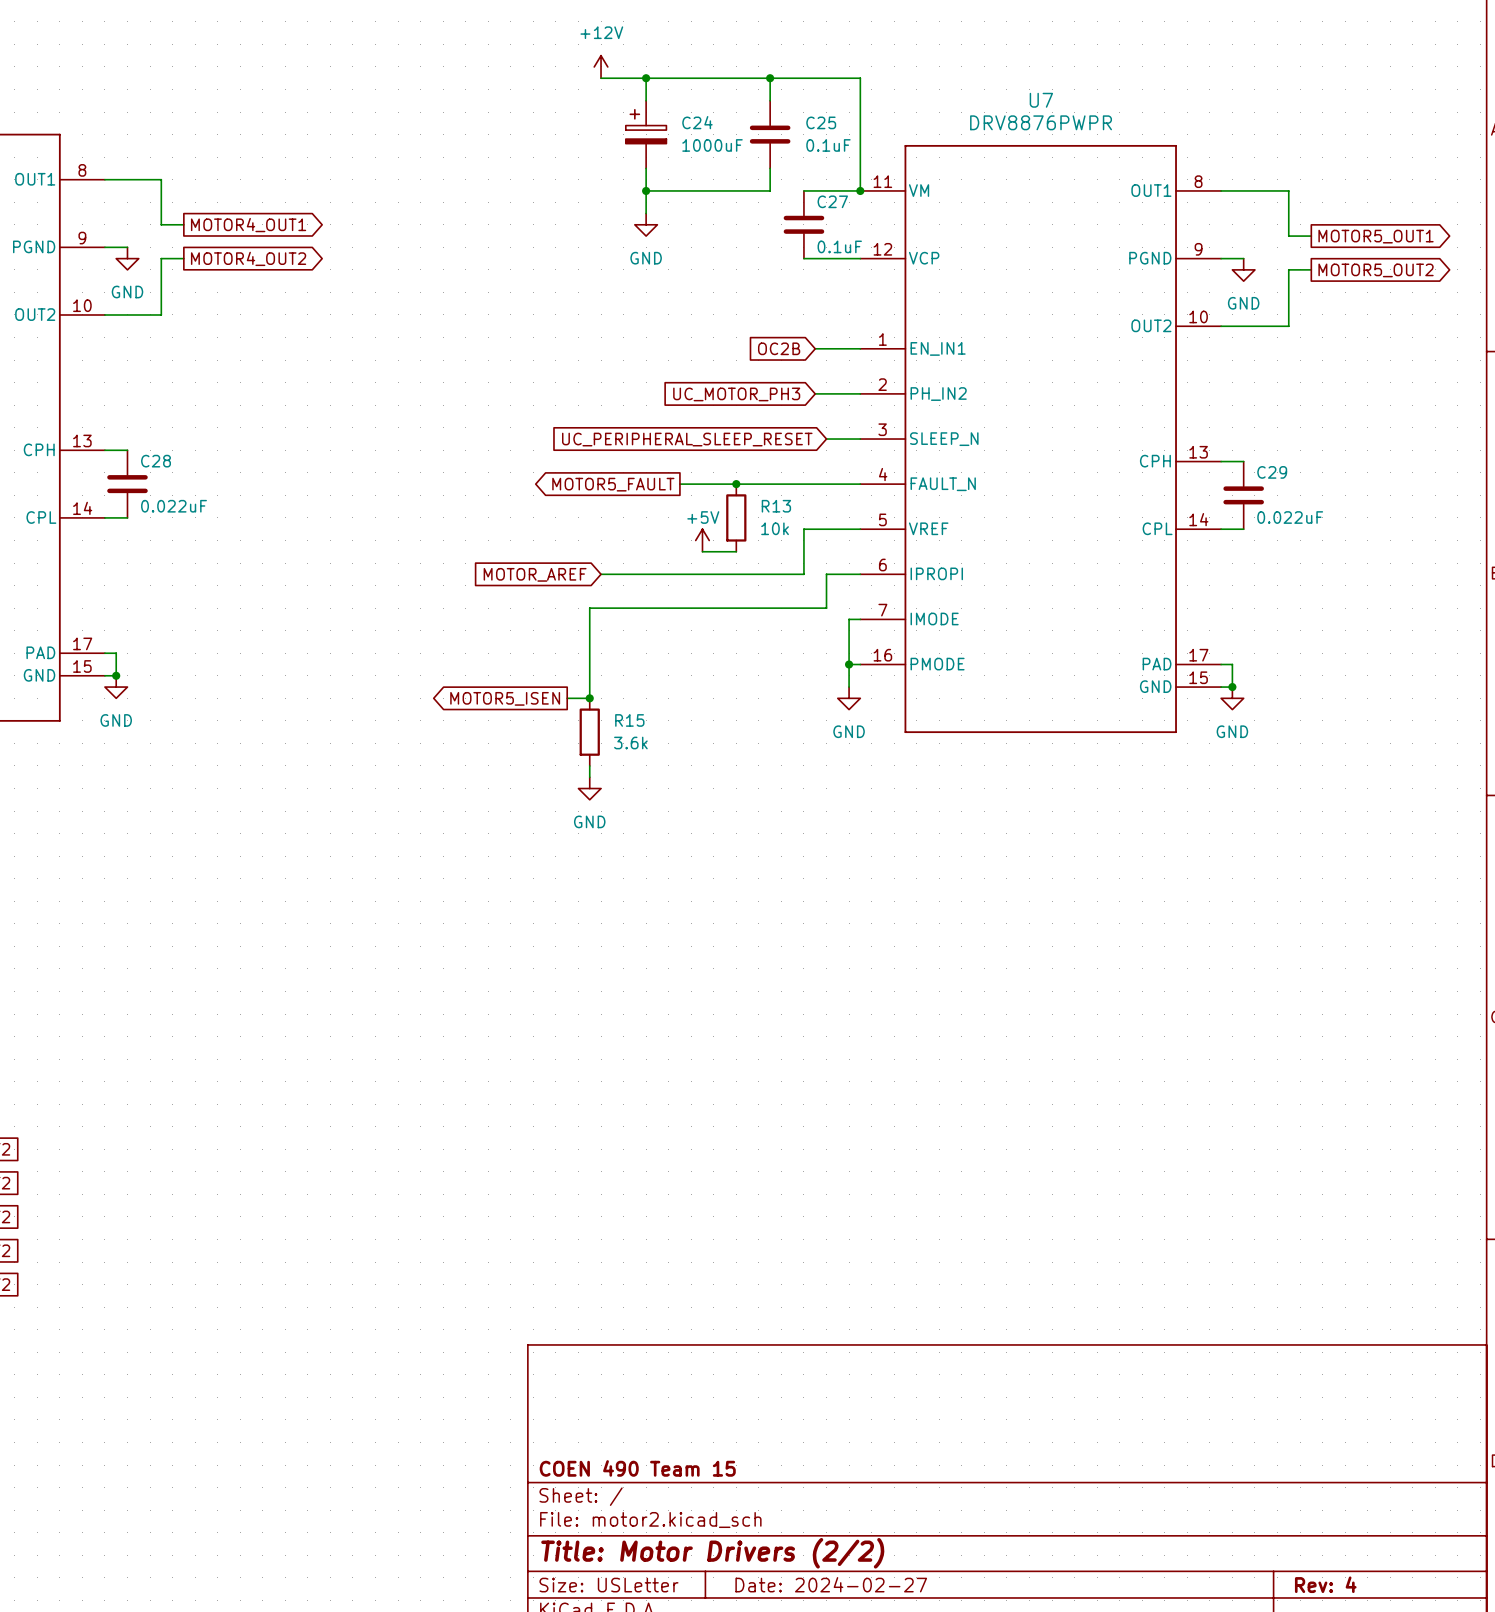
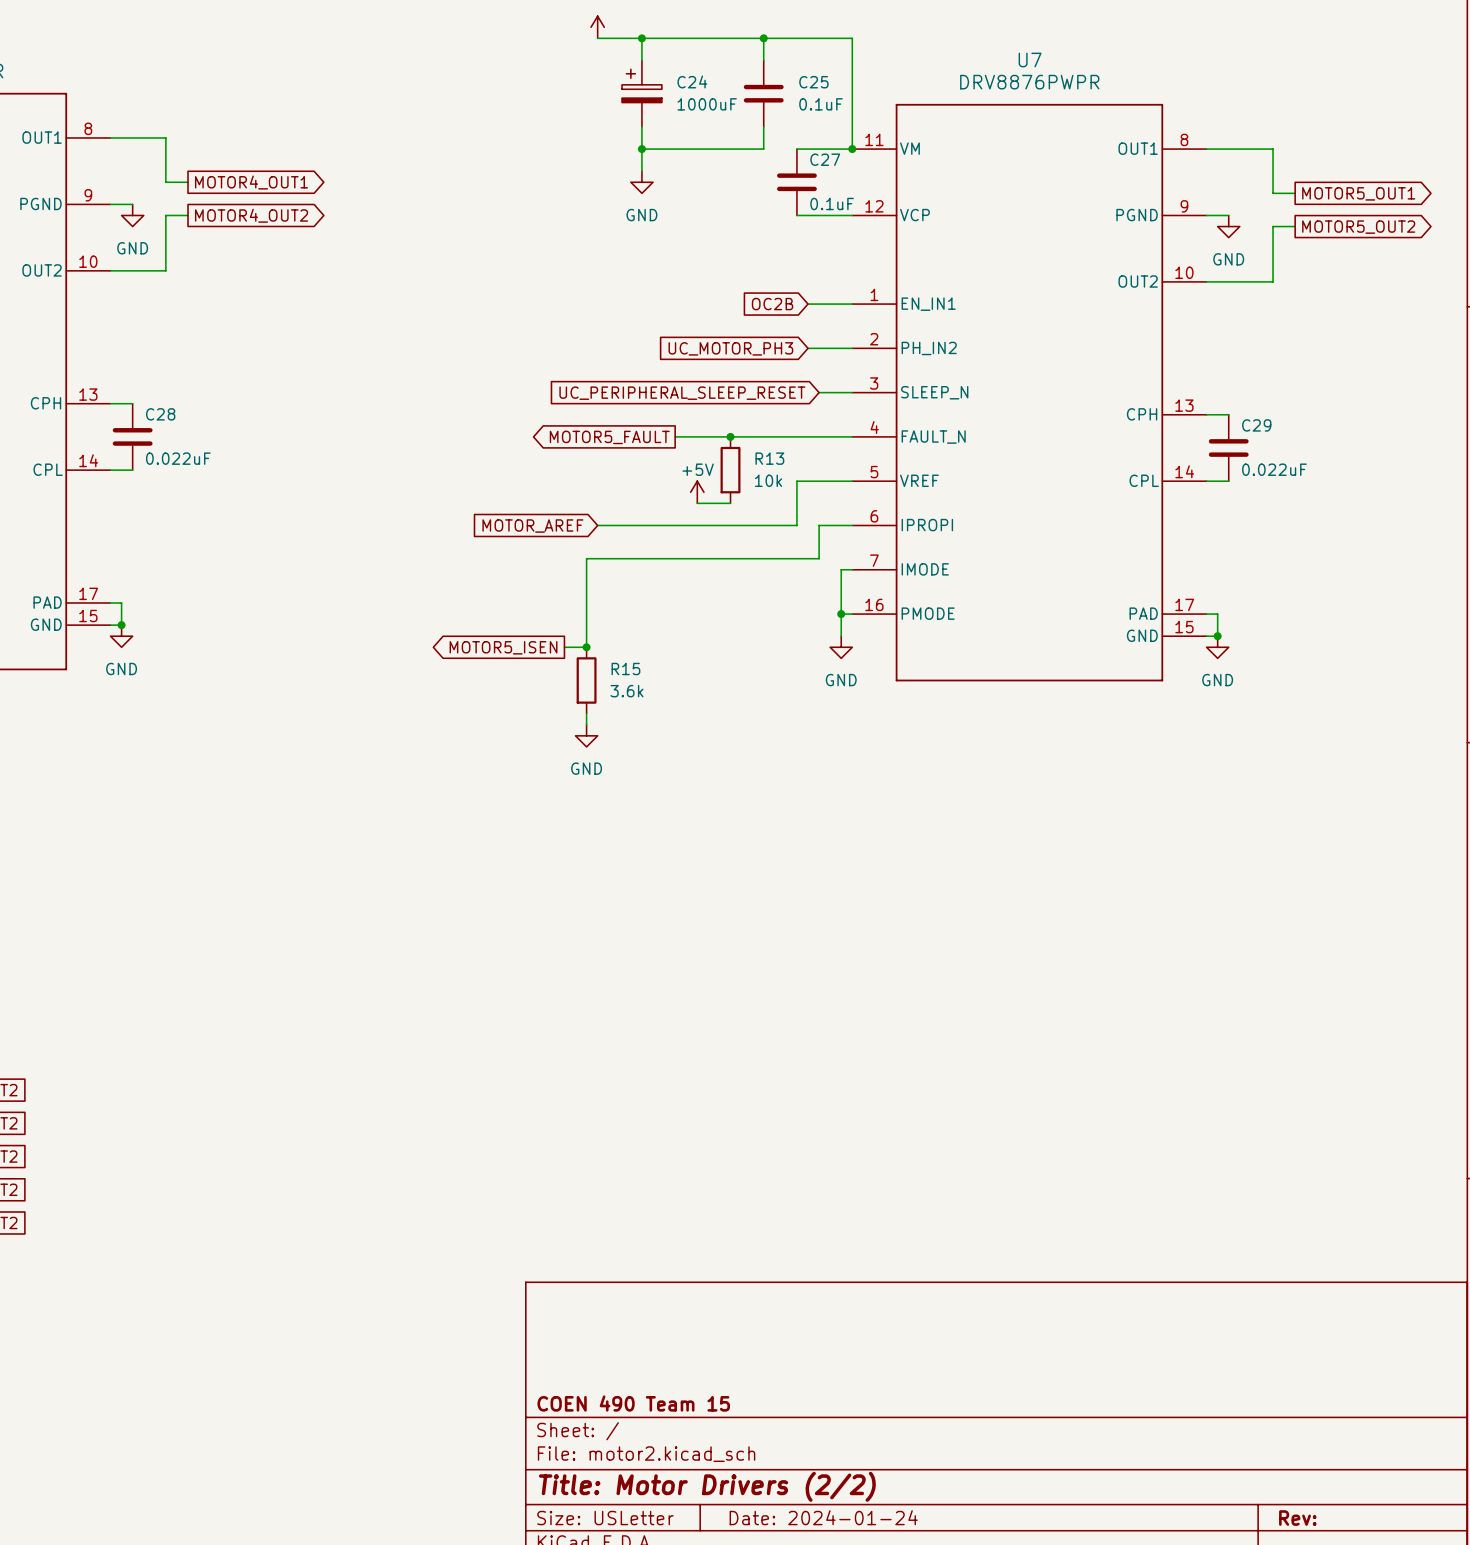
title block: Date: 2024-02-27 (831, 1584) -> Date: 2024-01-24 (823, 1517)
title block: Rev: 4 (1325, 1584) -> Rev: (1297, 1518)

